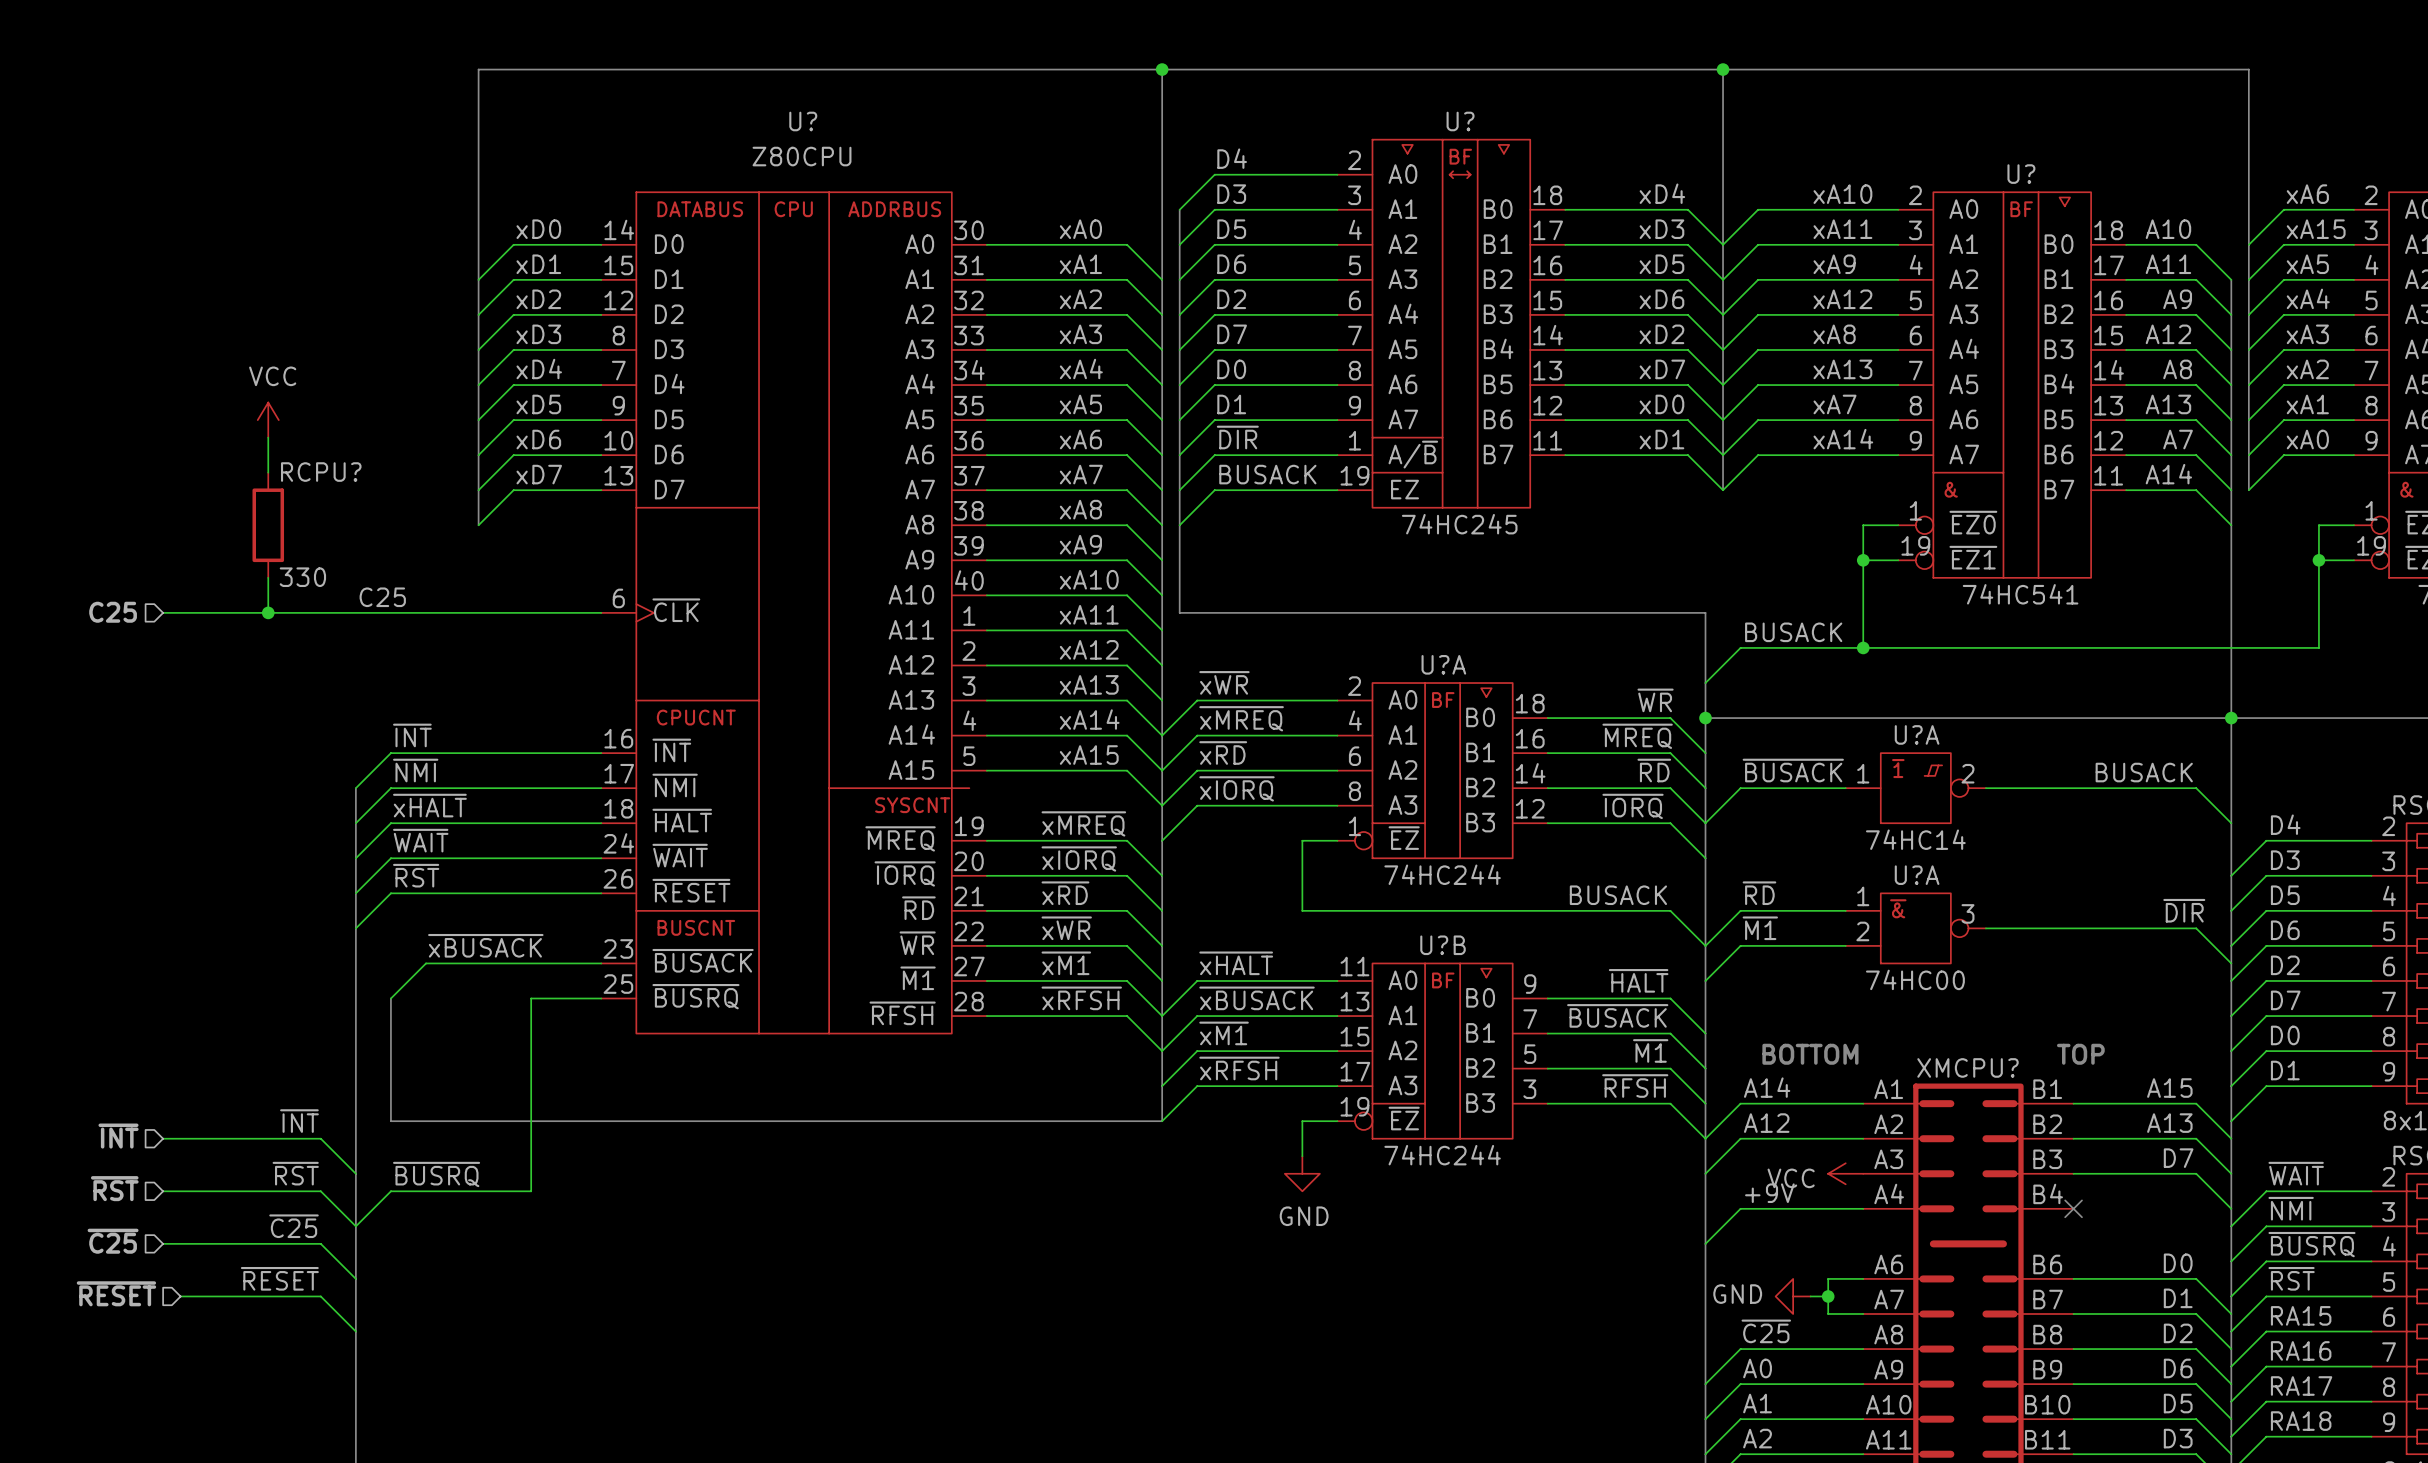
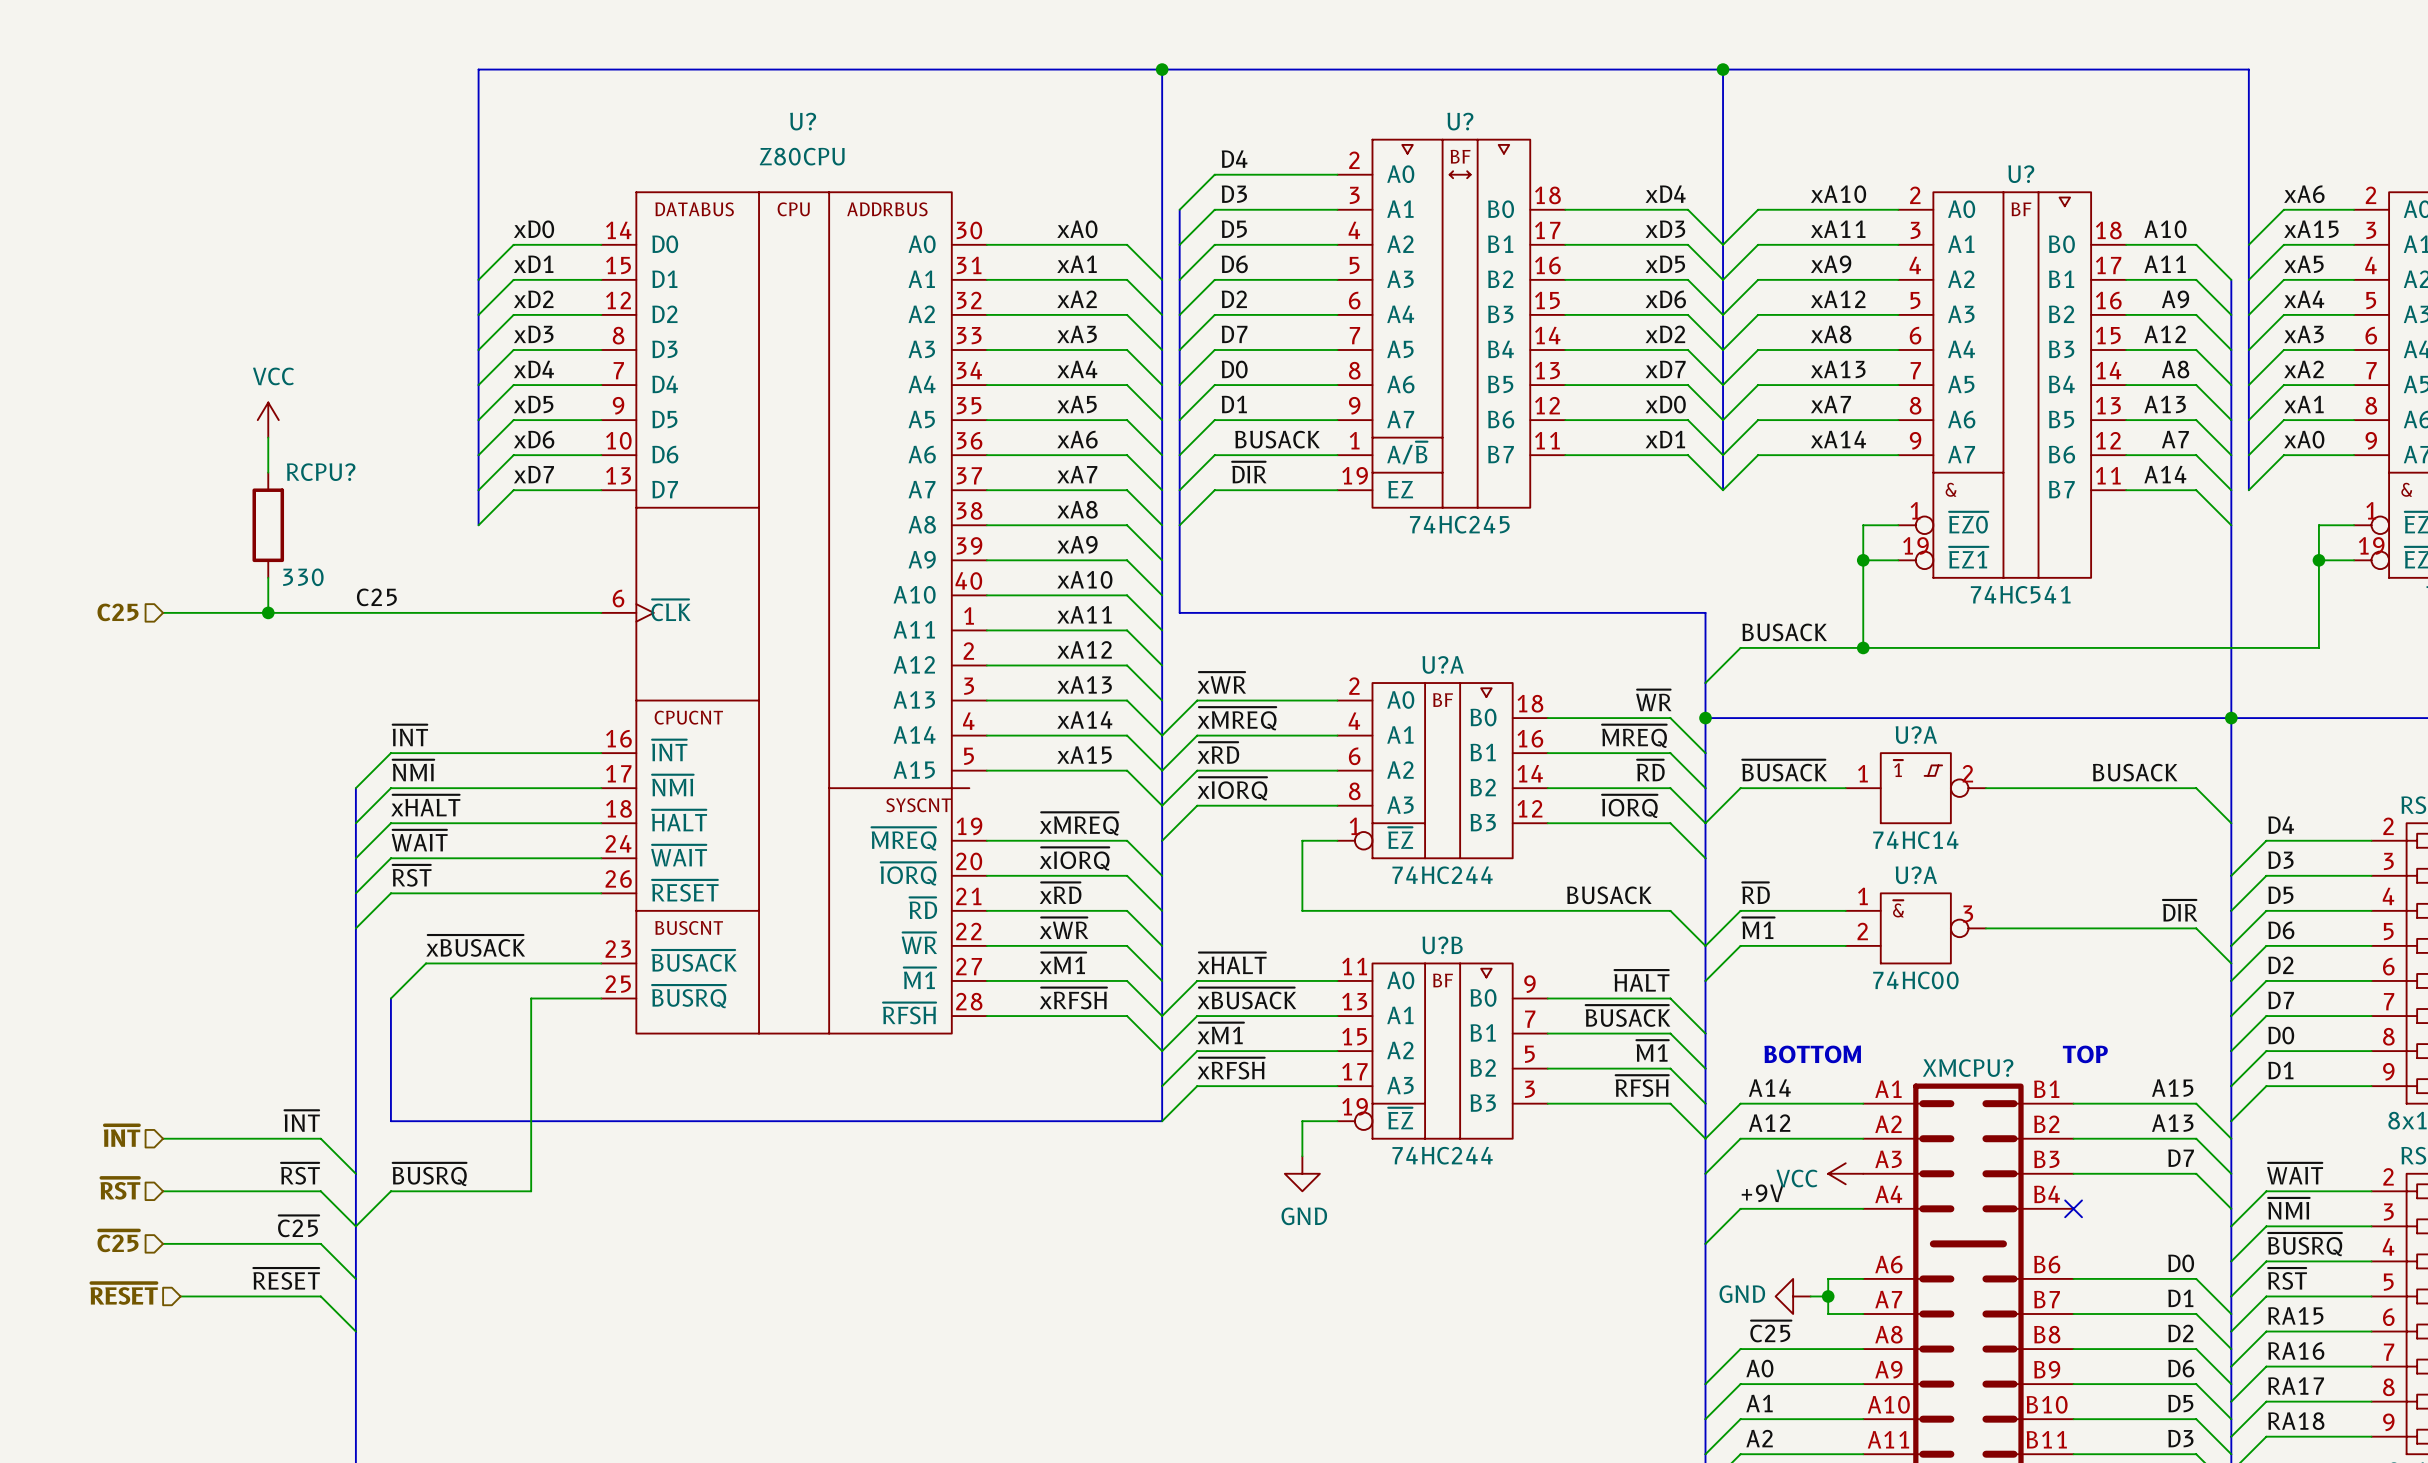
label position: ~{DIR} (1237, 437) -> ~{DIR} (1249, 472)
label position: BUSACK (1267, 474) -> BUSACK (1277, 439)

